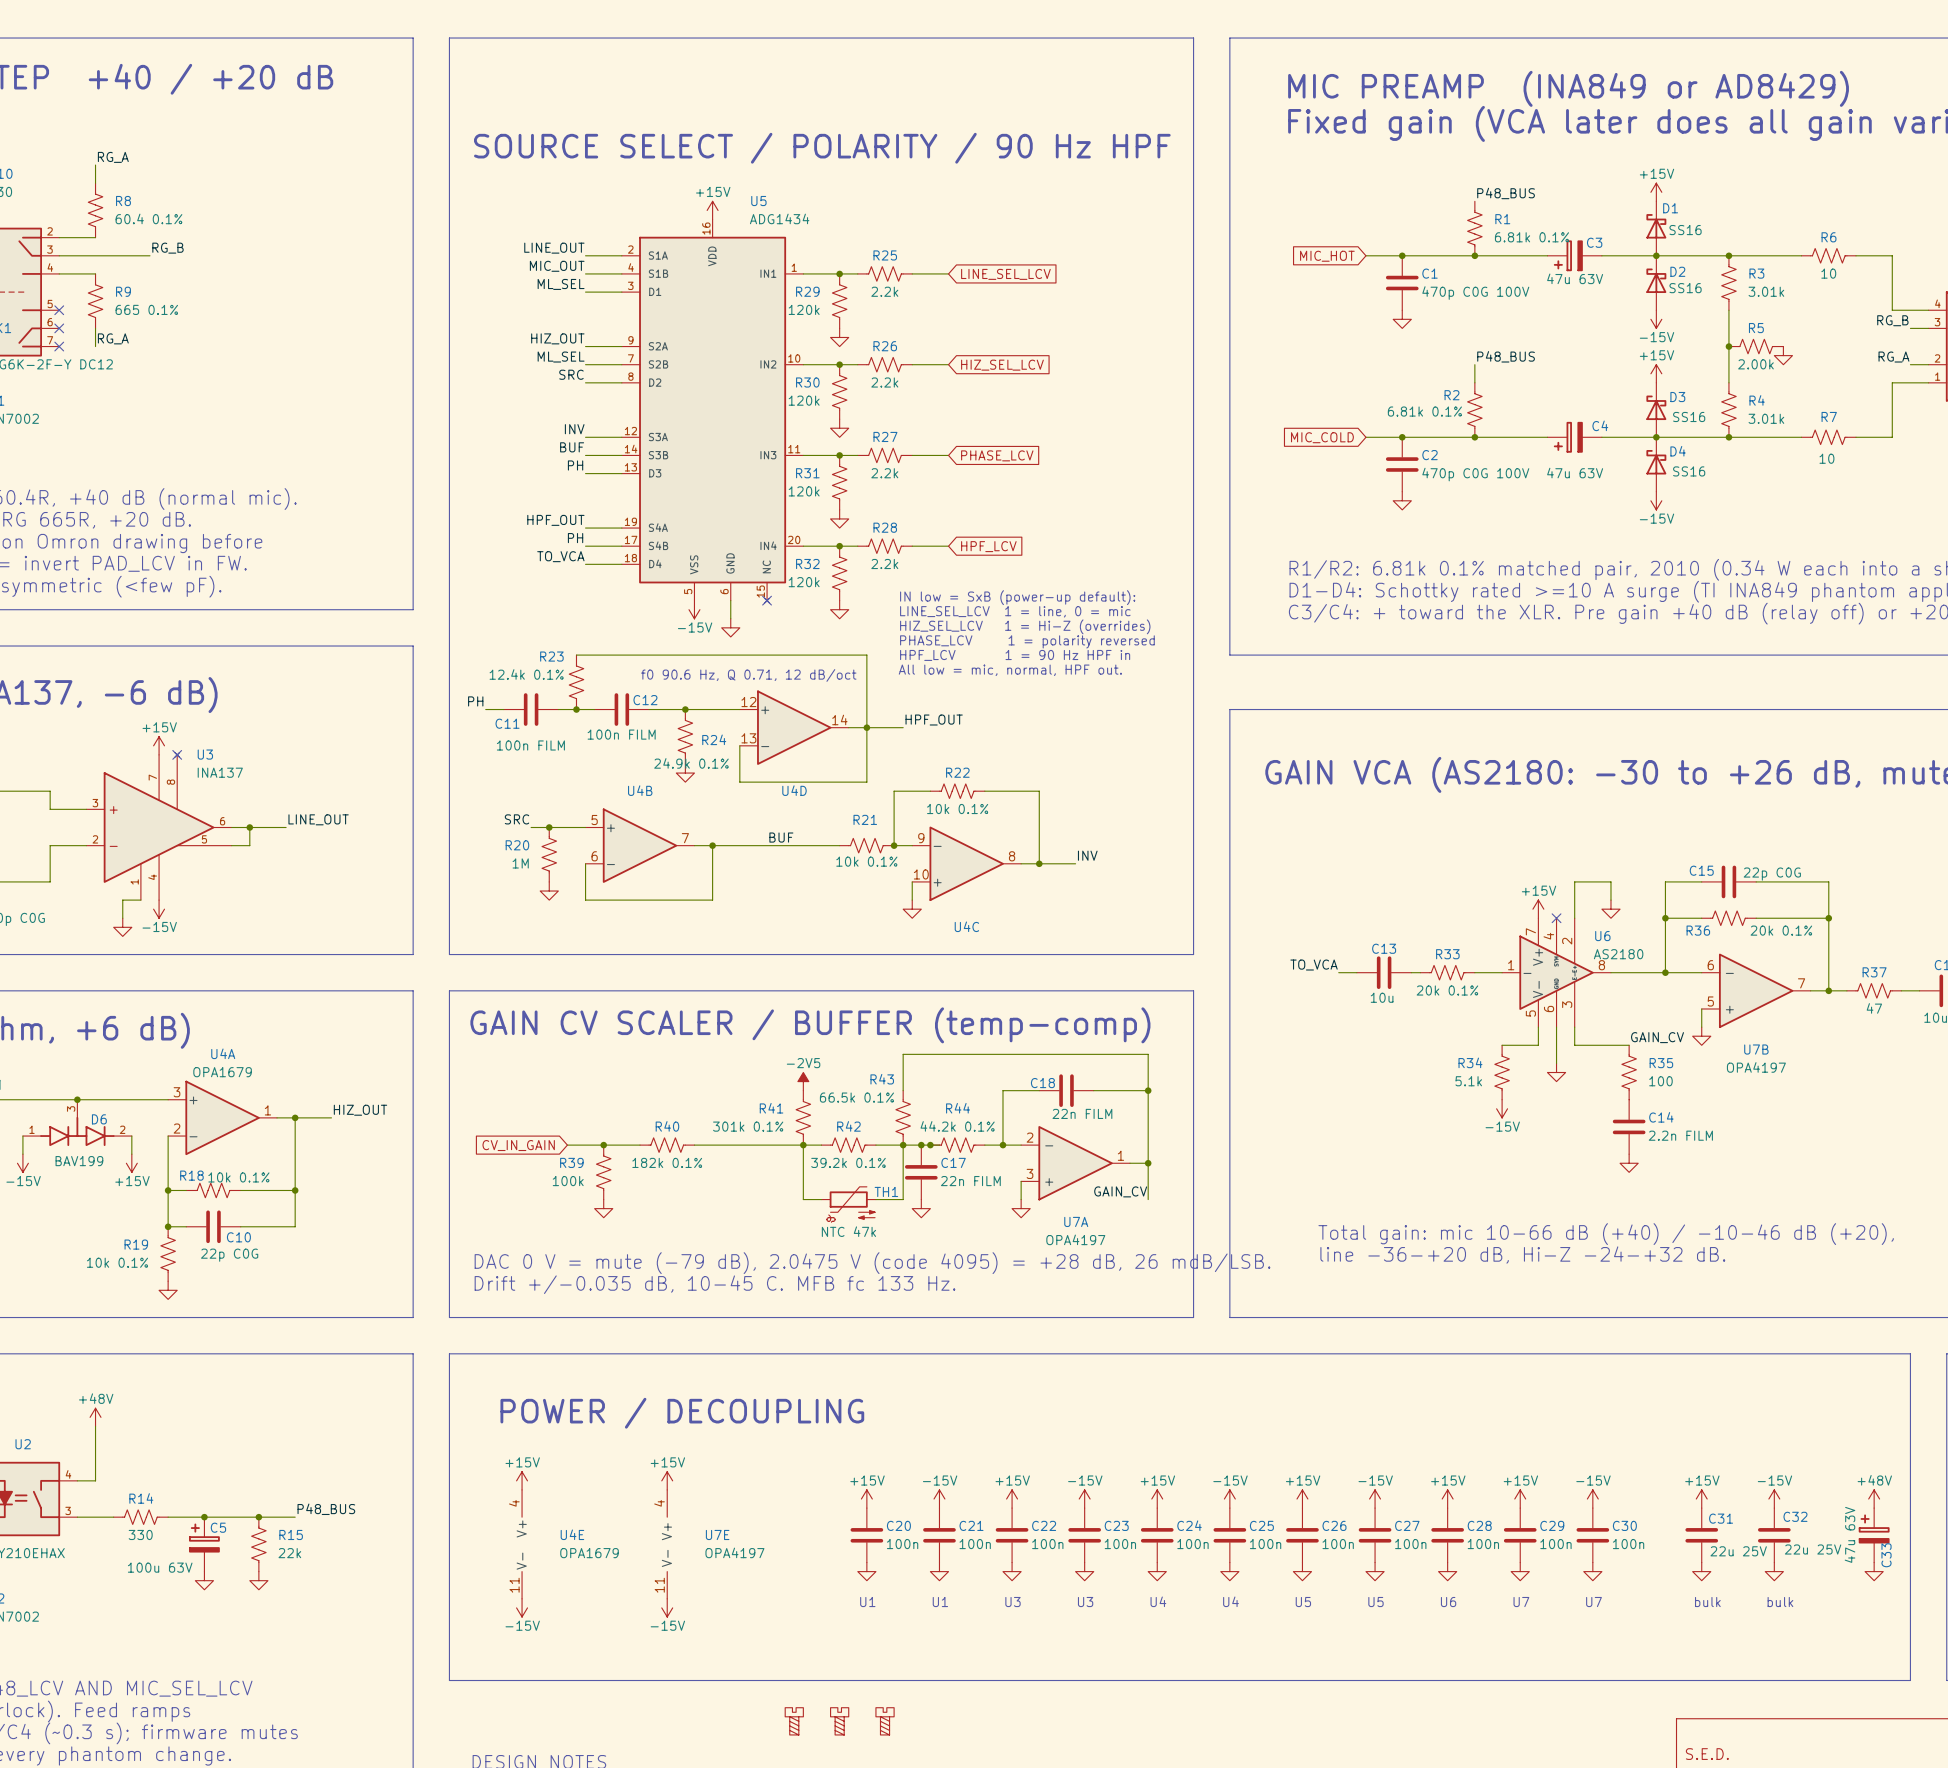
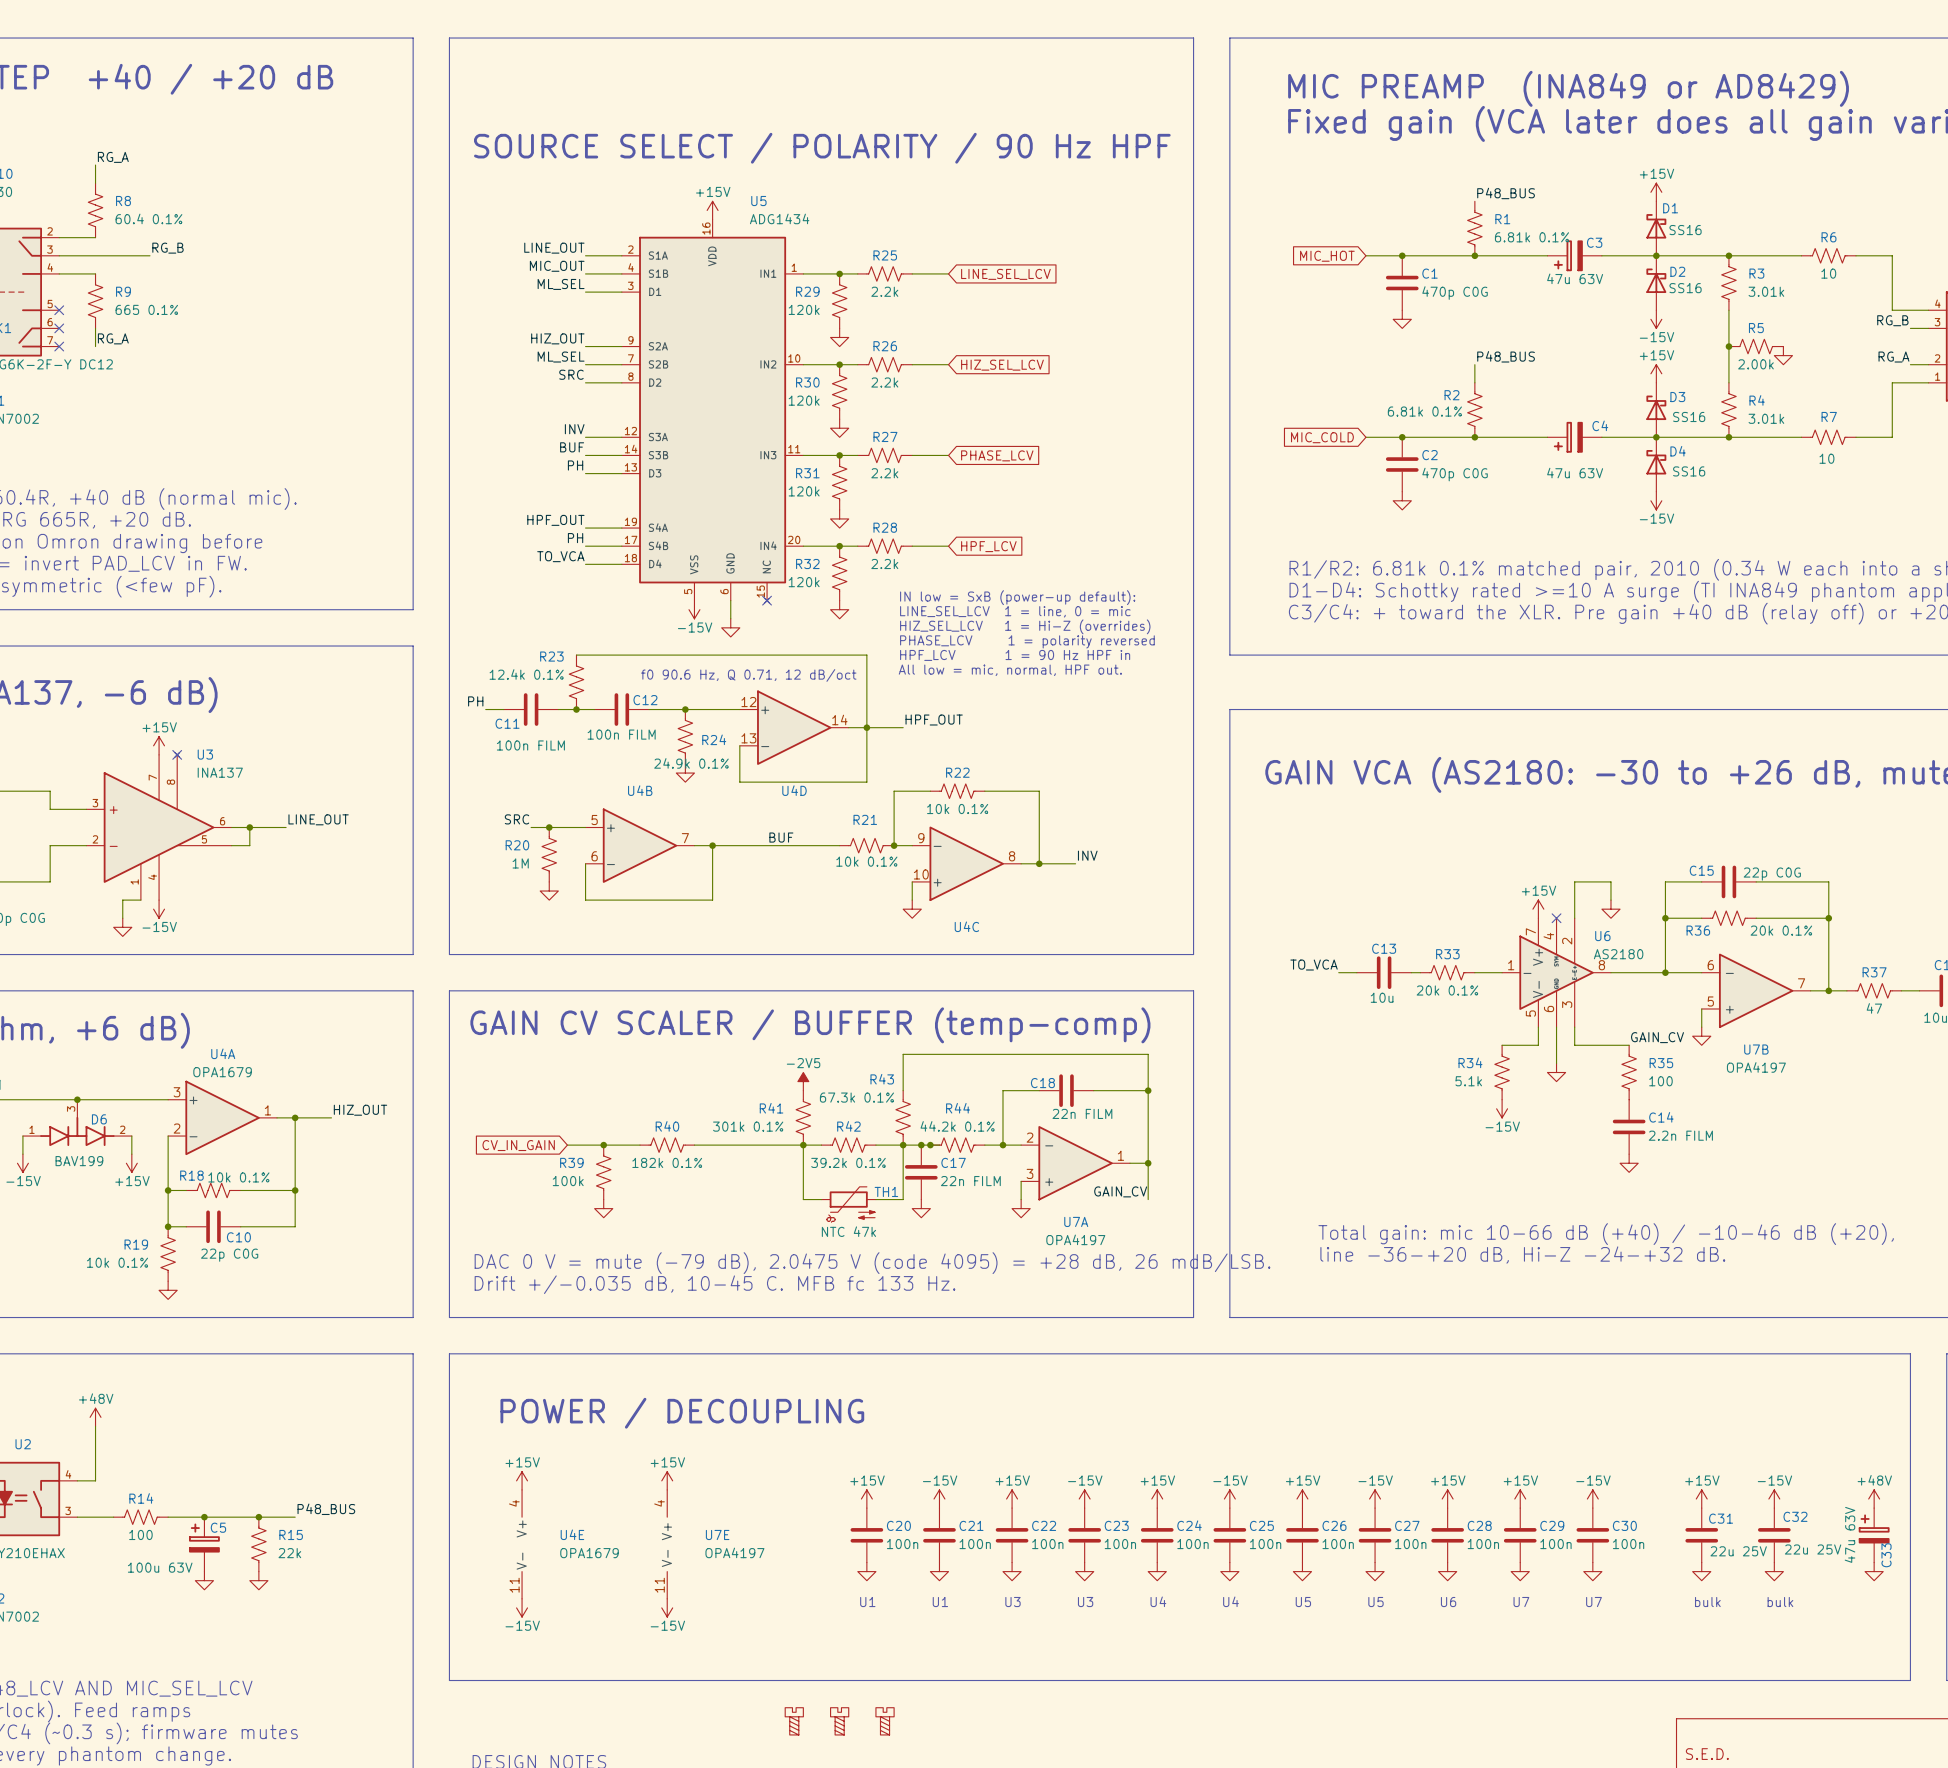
C1 value: 470p C0G 100V (1475, 293) -> 470p C0G (1455, 293)
C2 value: 470p C0G 100V (1475, 474) -> 470p C0G (1455, 474)
R43 value: 66.5k 0.1% (856, 1097) -> 67.3k 0.1% (856, 1097)
R14 value: 330 (140, 1534) -> 100 (140, 1534)

